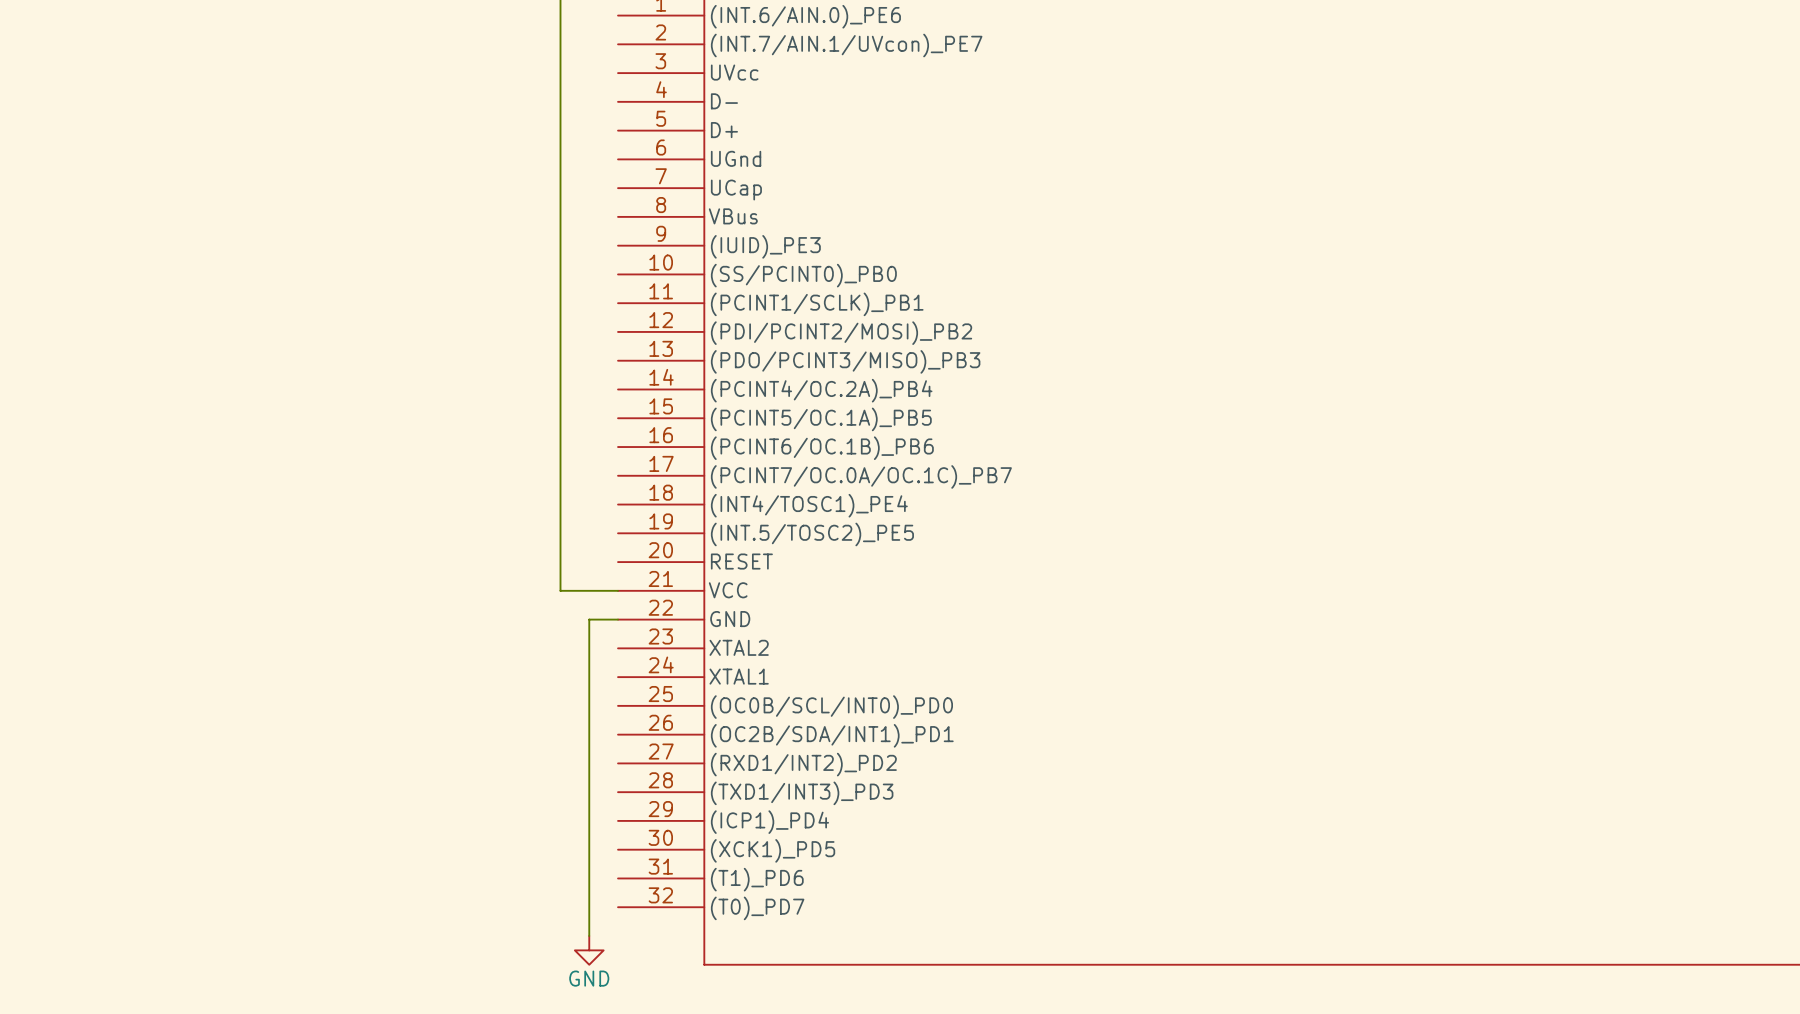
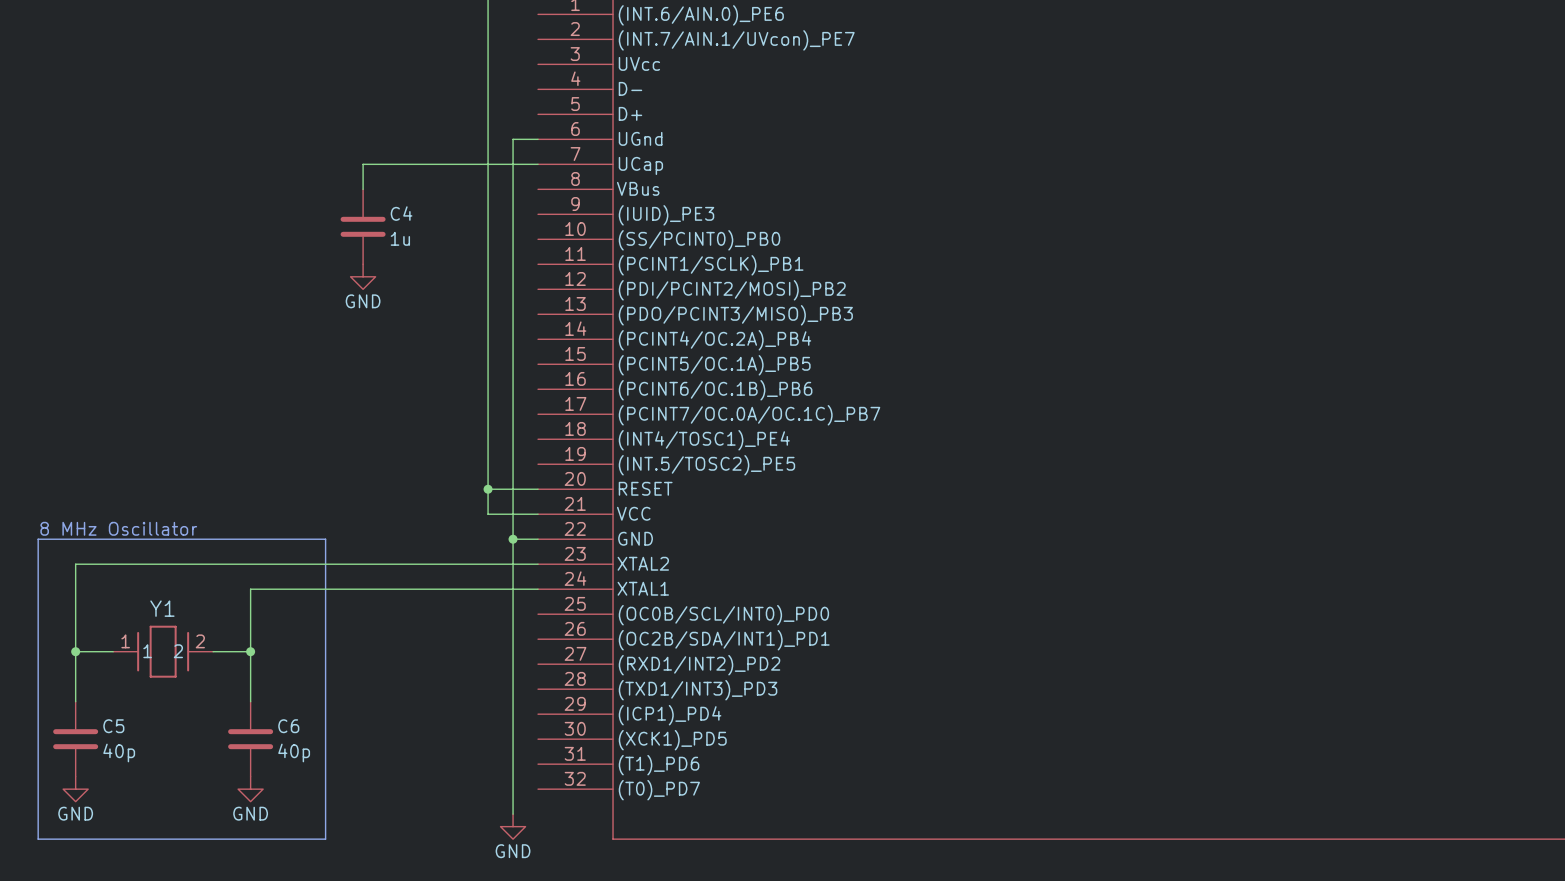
wire: none -> (538, 139) (513, 139) (513, 539)
wire: none -> (538, 164) (363, 164) (363, 189)
C4: none -> 1u (363, 226)
power symbol: none -> GND (363, 276)
wire: none -> (488, 489) (538, 489)
junction: none -> (488, 489)
text: none -> 8 MHz Oscillator (118, 528)
line: none -> (38, 539) (325, 539) (325, 839) (38, 839) (38, 539)
junction: none -> (513, 539)
wire: none -> (538, 564) (75, 564) (75, 701)
wire: none -> (538, 589) (250, 589) (250, 701)
wire: none -> (75, 651) (113, 651)
junction: none -> (75, 651)
Y1: none -> (163, 651)
wire: none -> (213, 651) (250, 651)
junction: none -> (250, 651)
C5: none -> 40p (75, 739)
C6: none -> 40p (250, 739)
power symbol: none -> GND (75, 789)
power symbol: none -> GND (250, 789)

